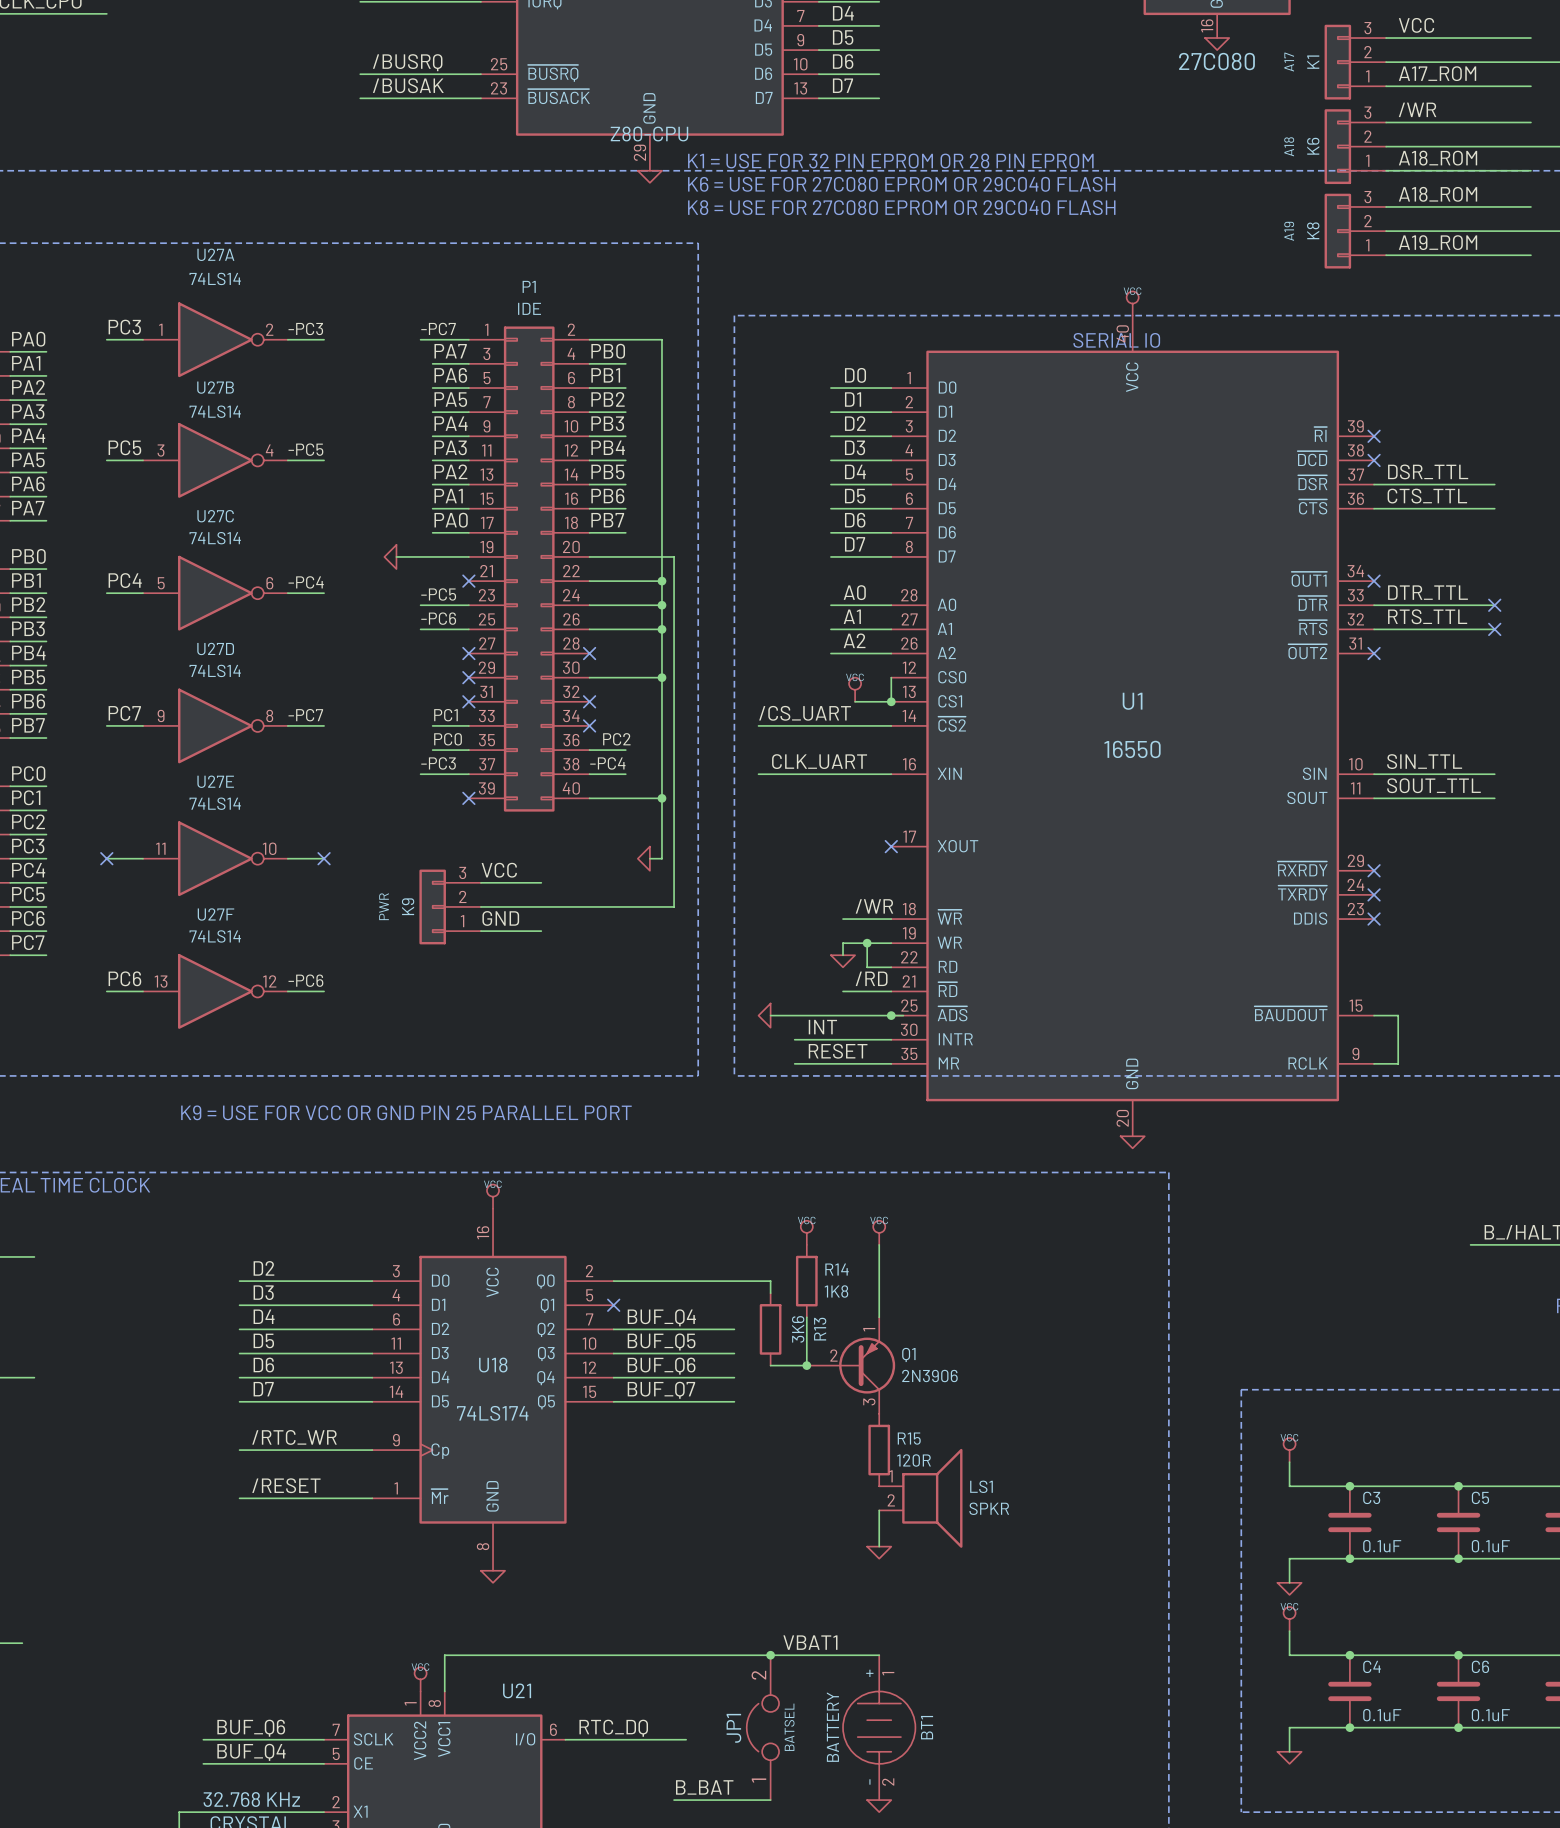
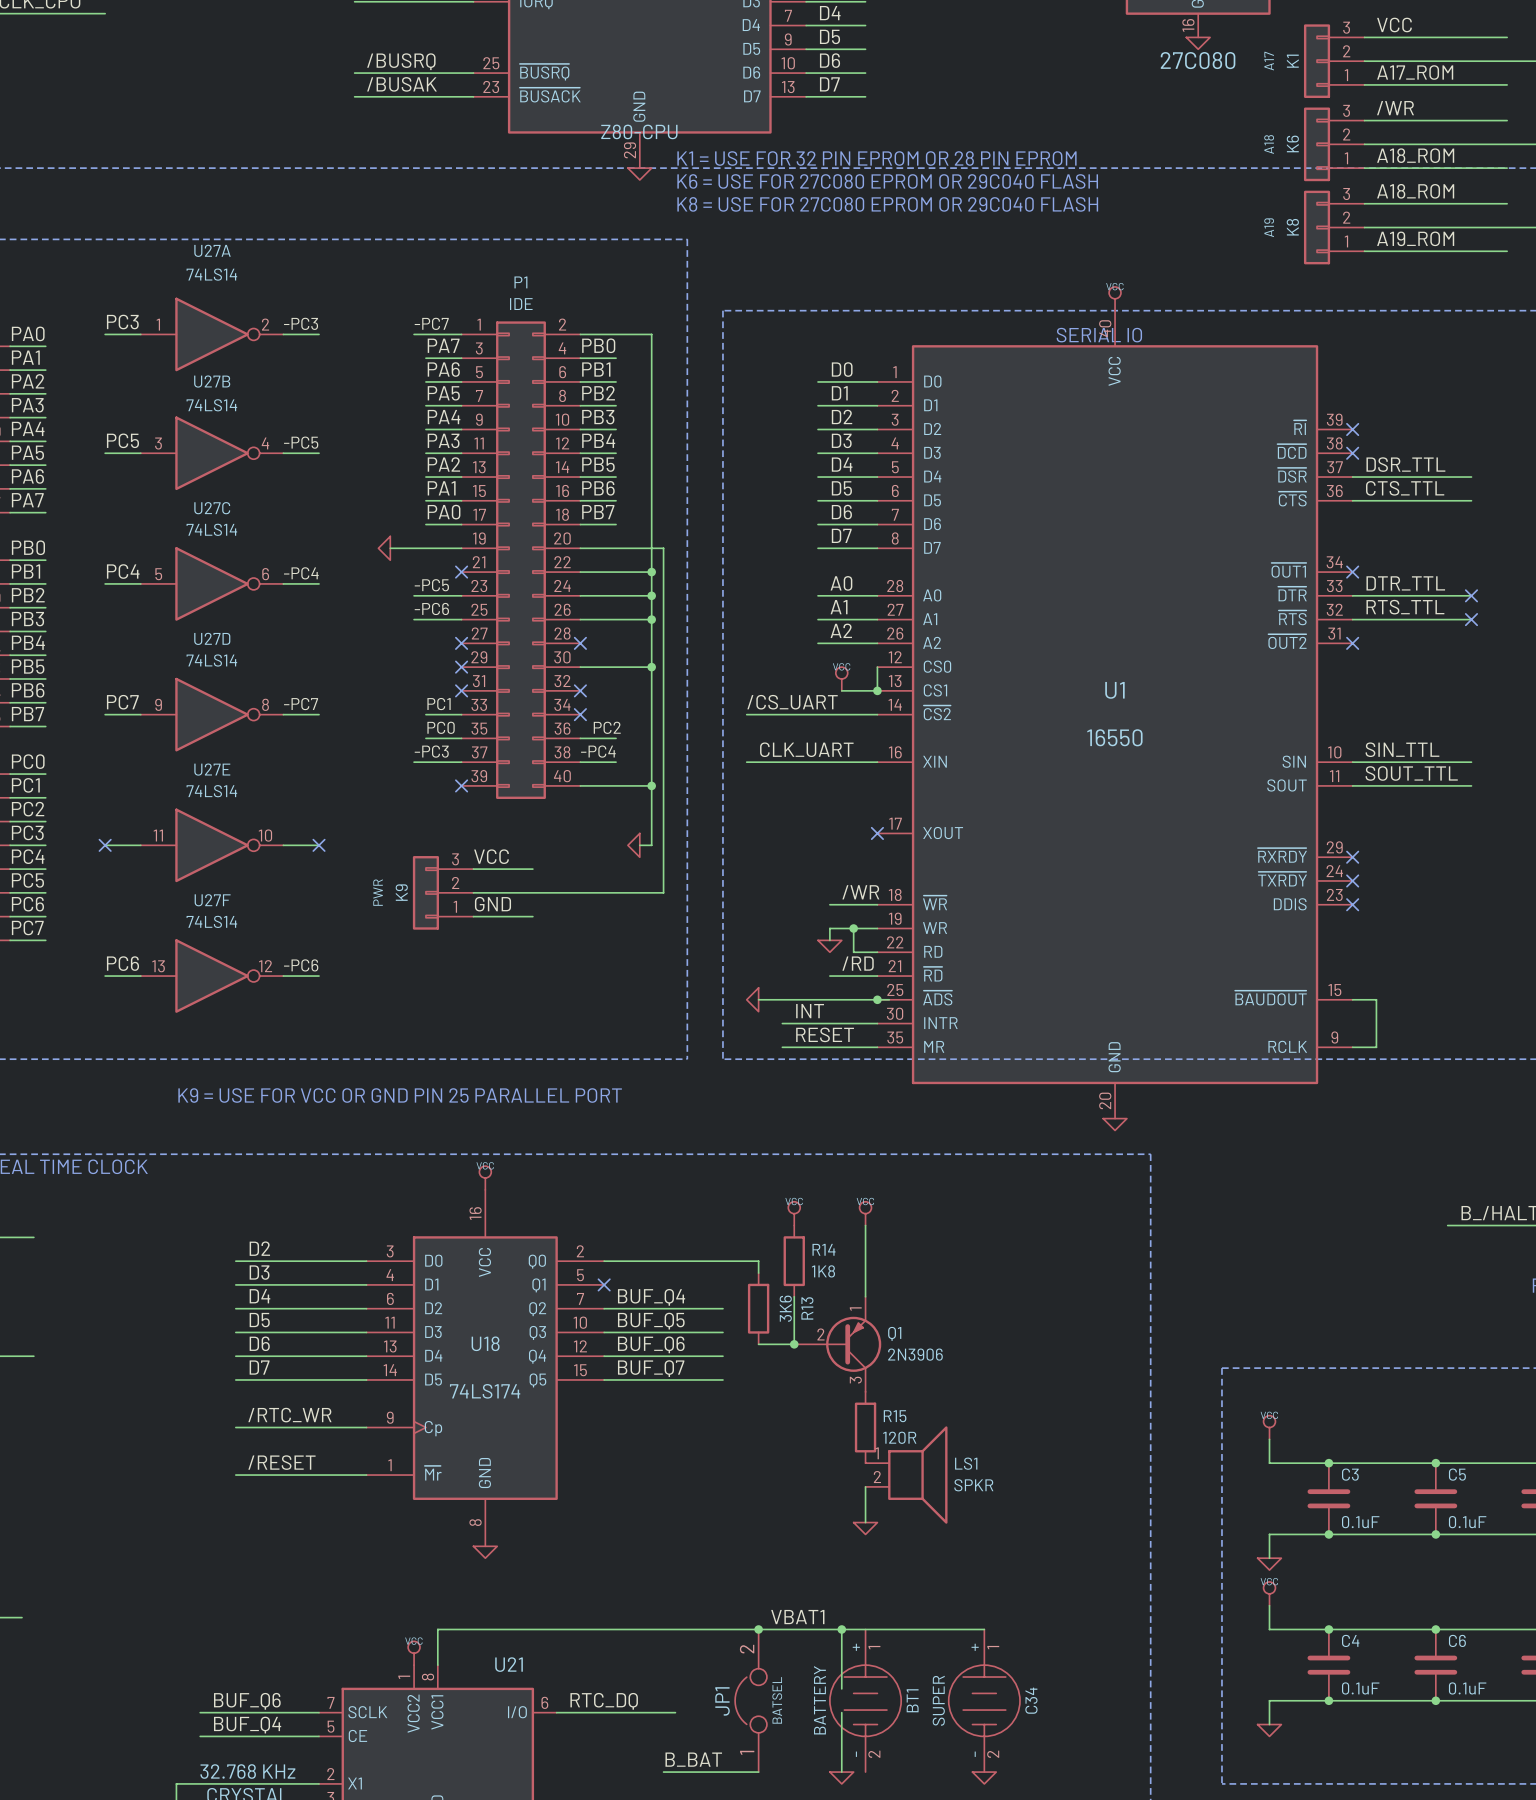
wire: none -> (841, 1629) (841, 1688)
junction: none -> (841, 1629)
wire: none -> (865, 1629) (984, 1629)
C34: none -> SUPER (984, 1700)
wire: none -> (841, 1712) (841, 1772)
power symbol position: (879, 1806) -> (841, 1778)
power symbol: none -> (984, 1778)

